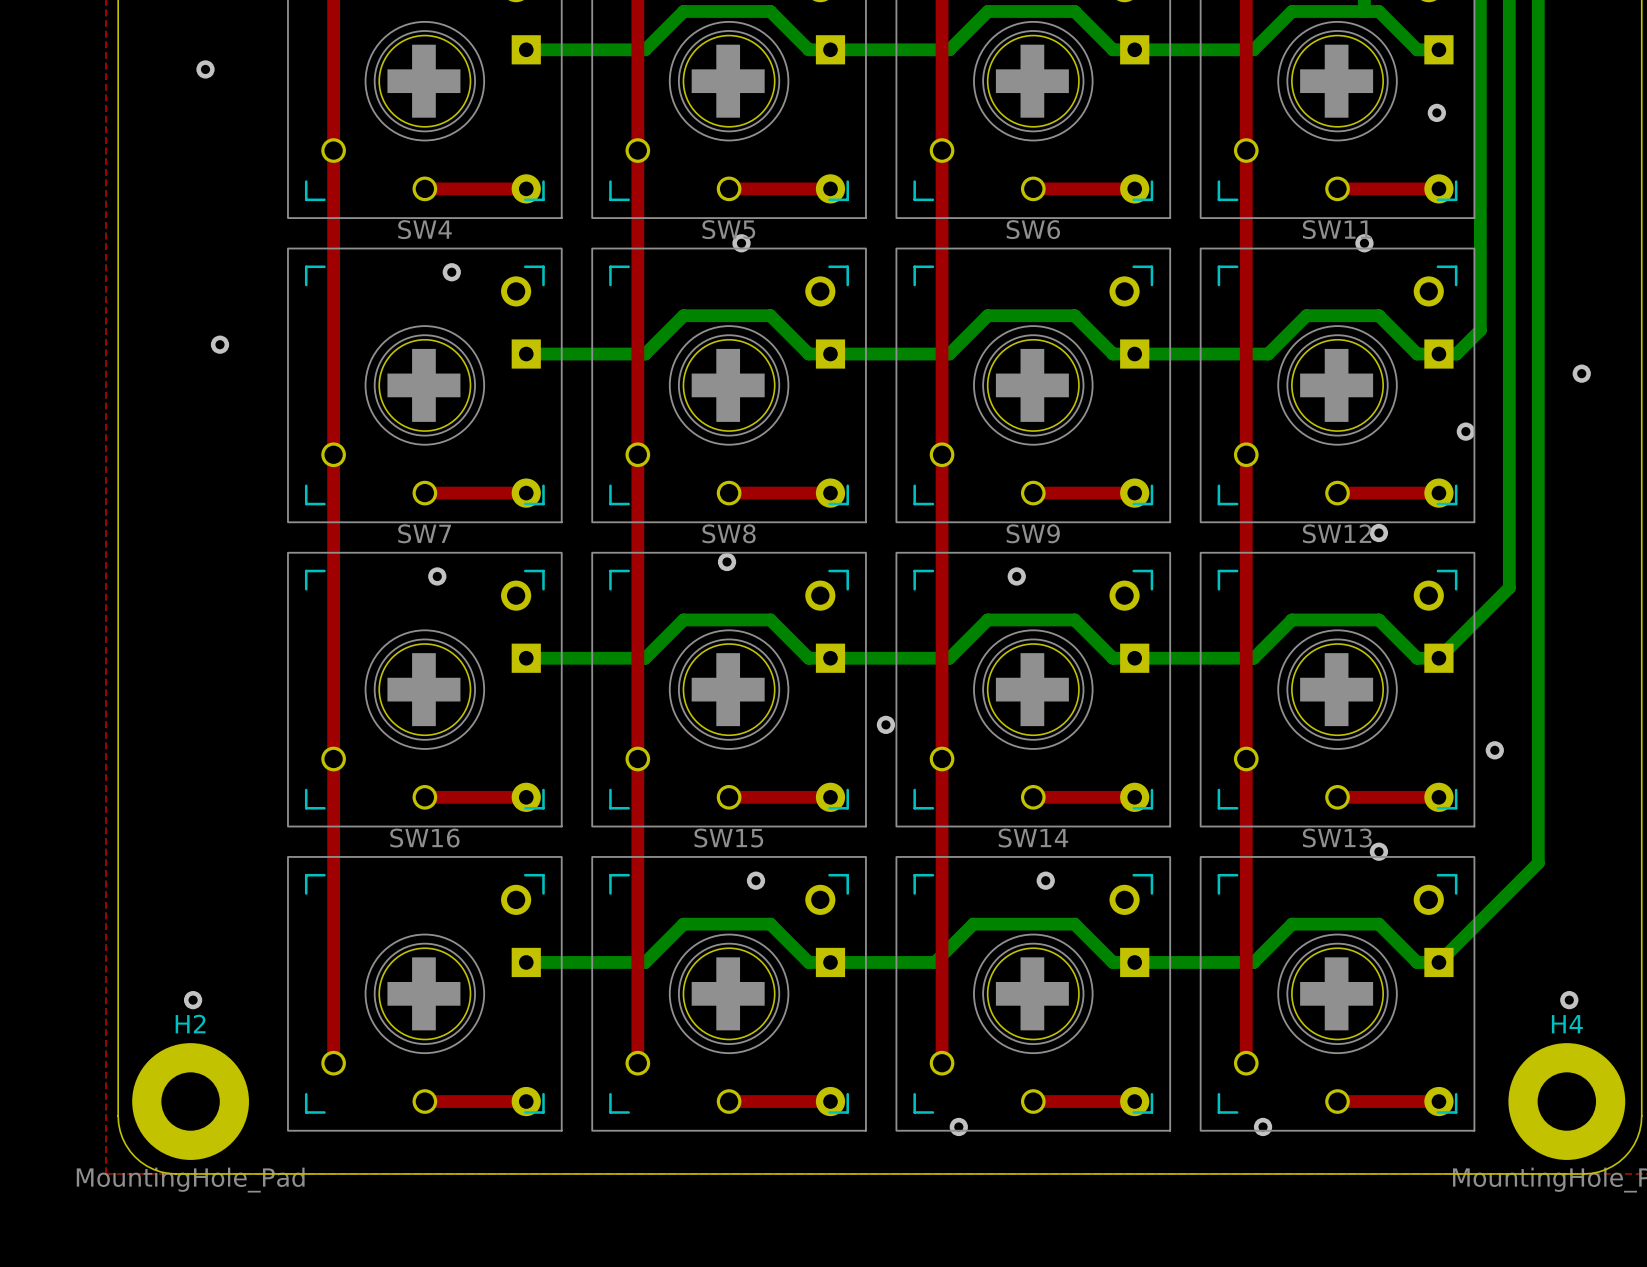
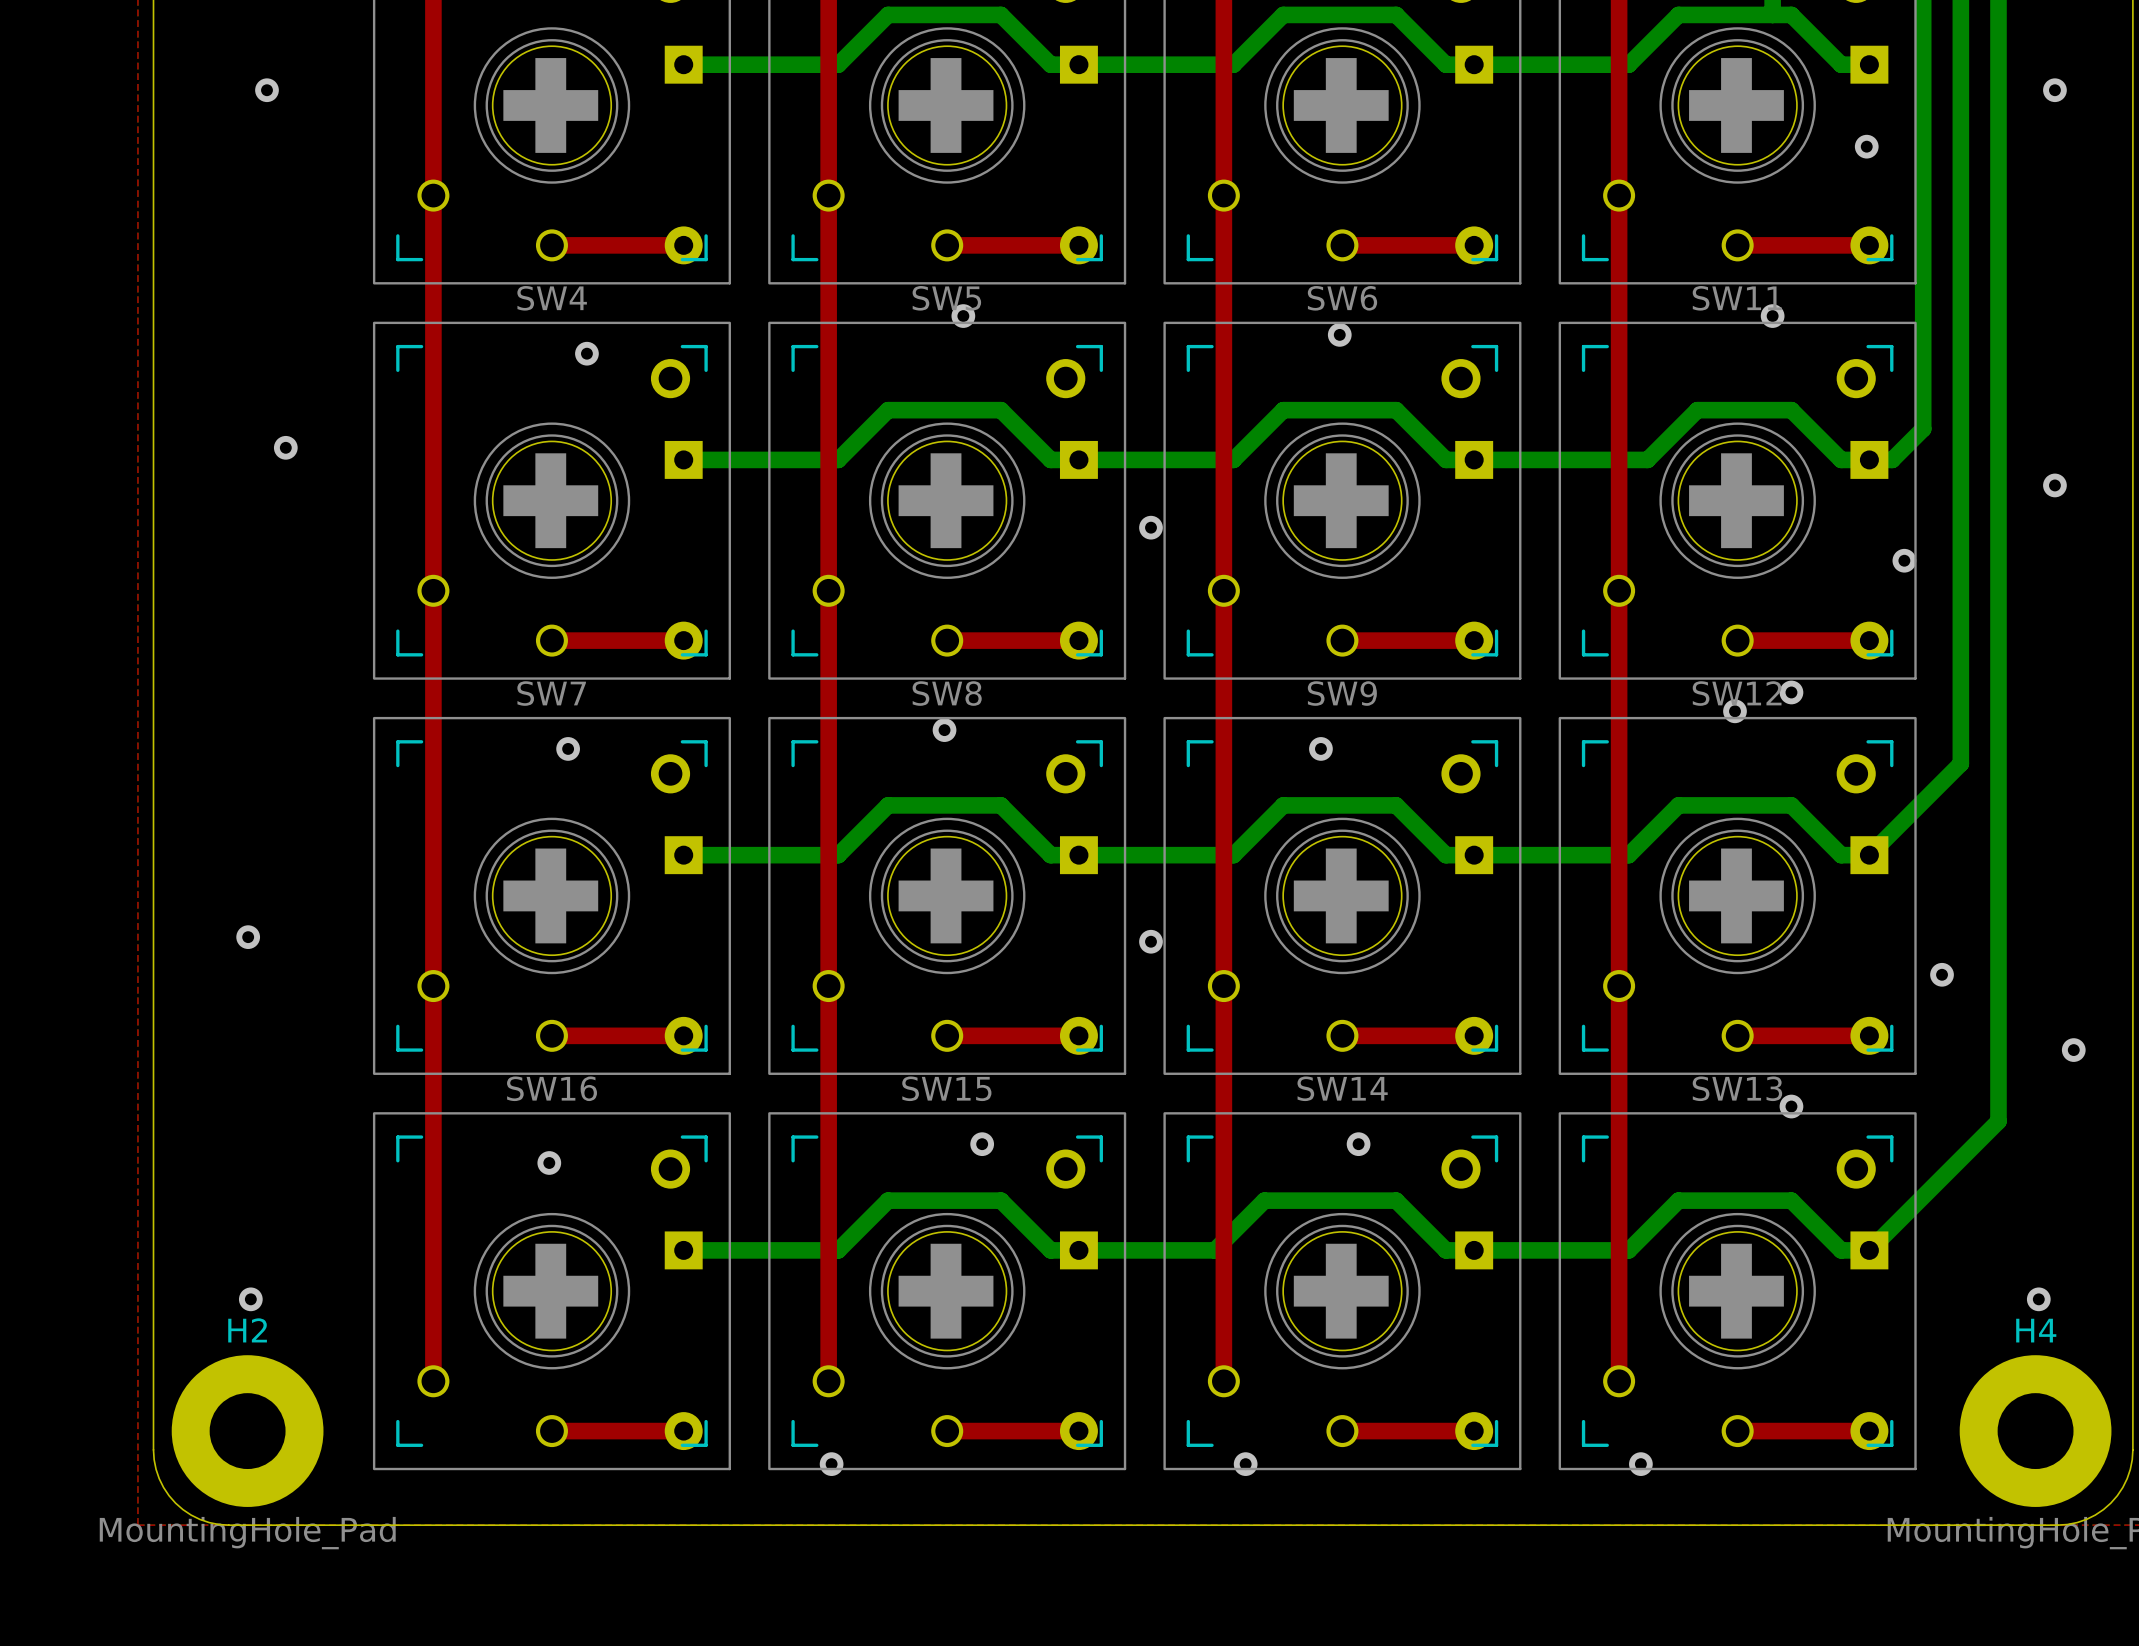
via: none -> (2054, 90)
via: none -> (1339, 334)
via: none -> (1150, 527)
via: none -> (1734, 711)
via: none -> (248, 937)
via: none -> (2073, 1050)
via: none -> (549, 1162)
via: none -> (831, 1464)

